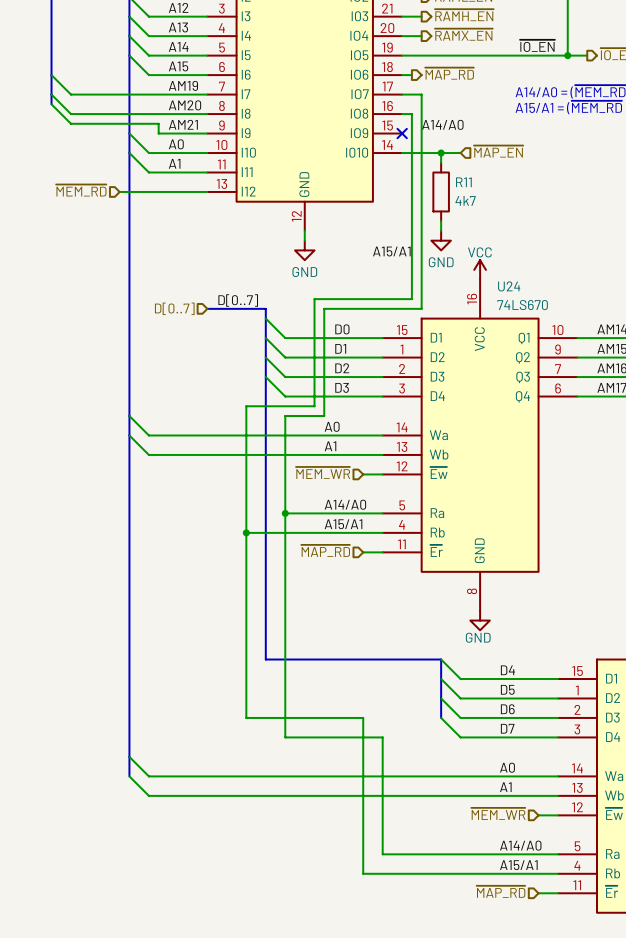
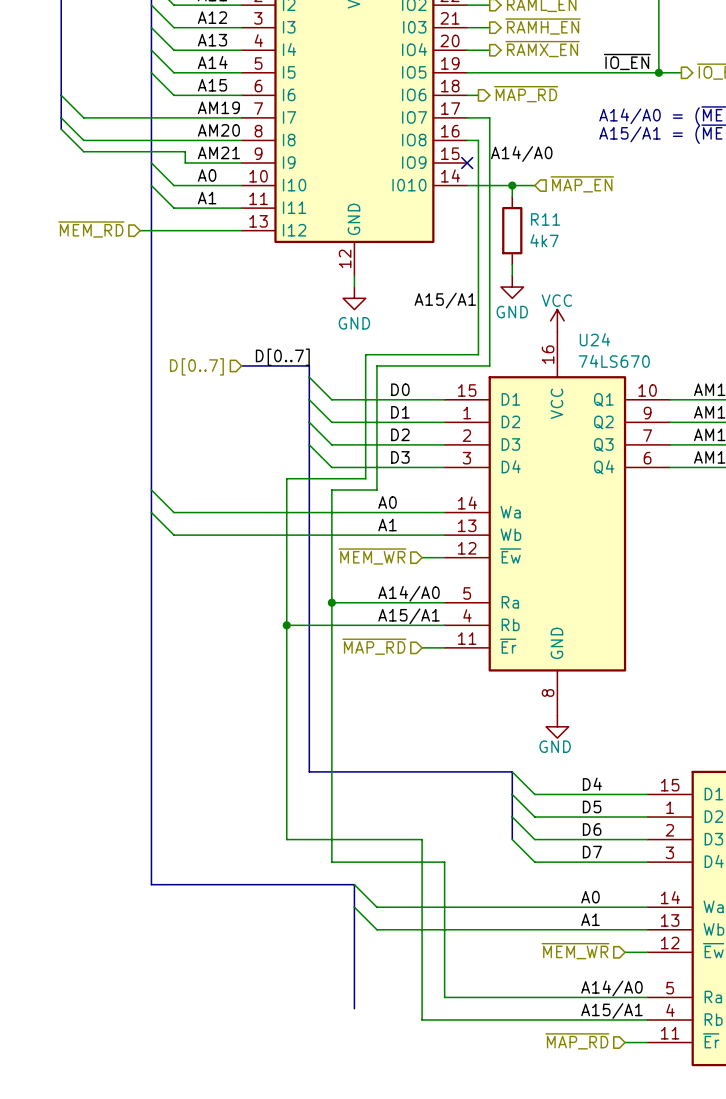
wire: (129, 756) (148, 776) (324, 776) -> (354, 884) (376, 907)
bus: (129, 756) (129, 776) -> (151, 884) (354, 884) (354, 1008)
wire: (129, 776) (148, 795) (324, 795) -> (354, 907) (376, 929)

